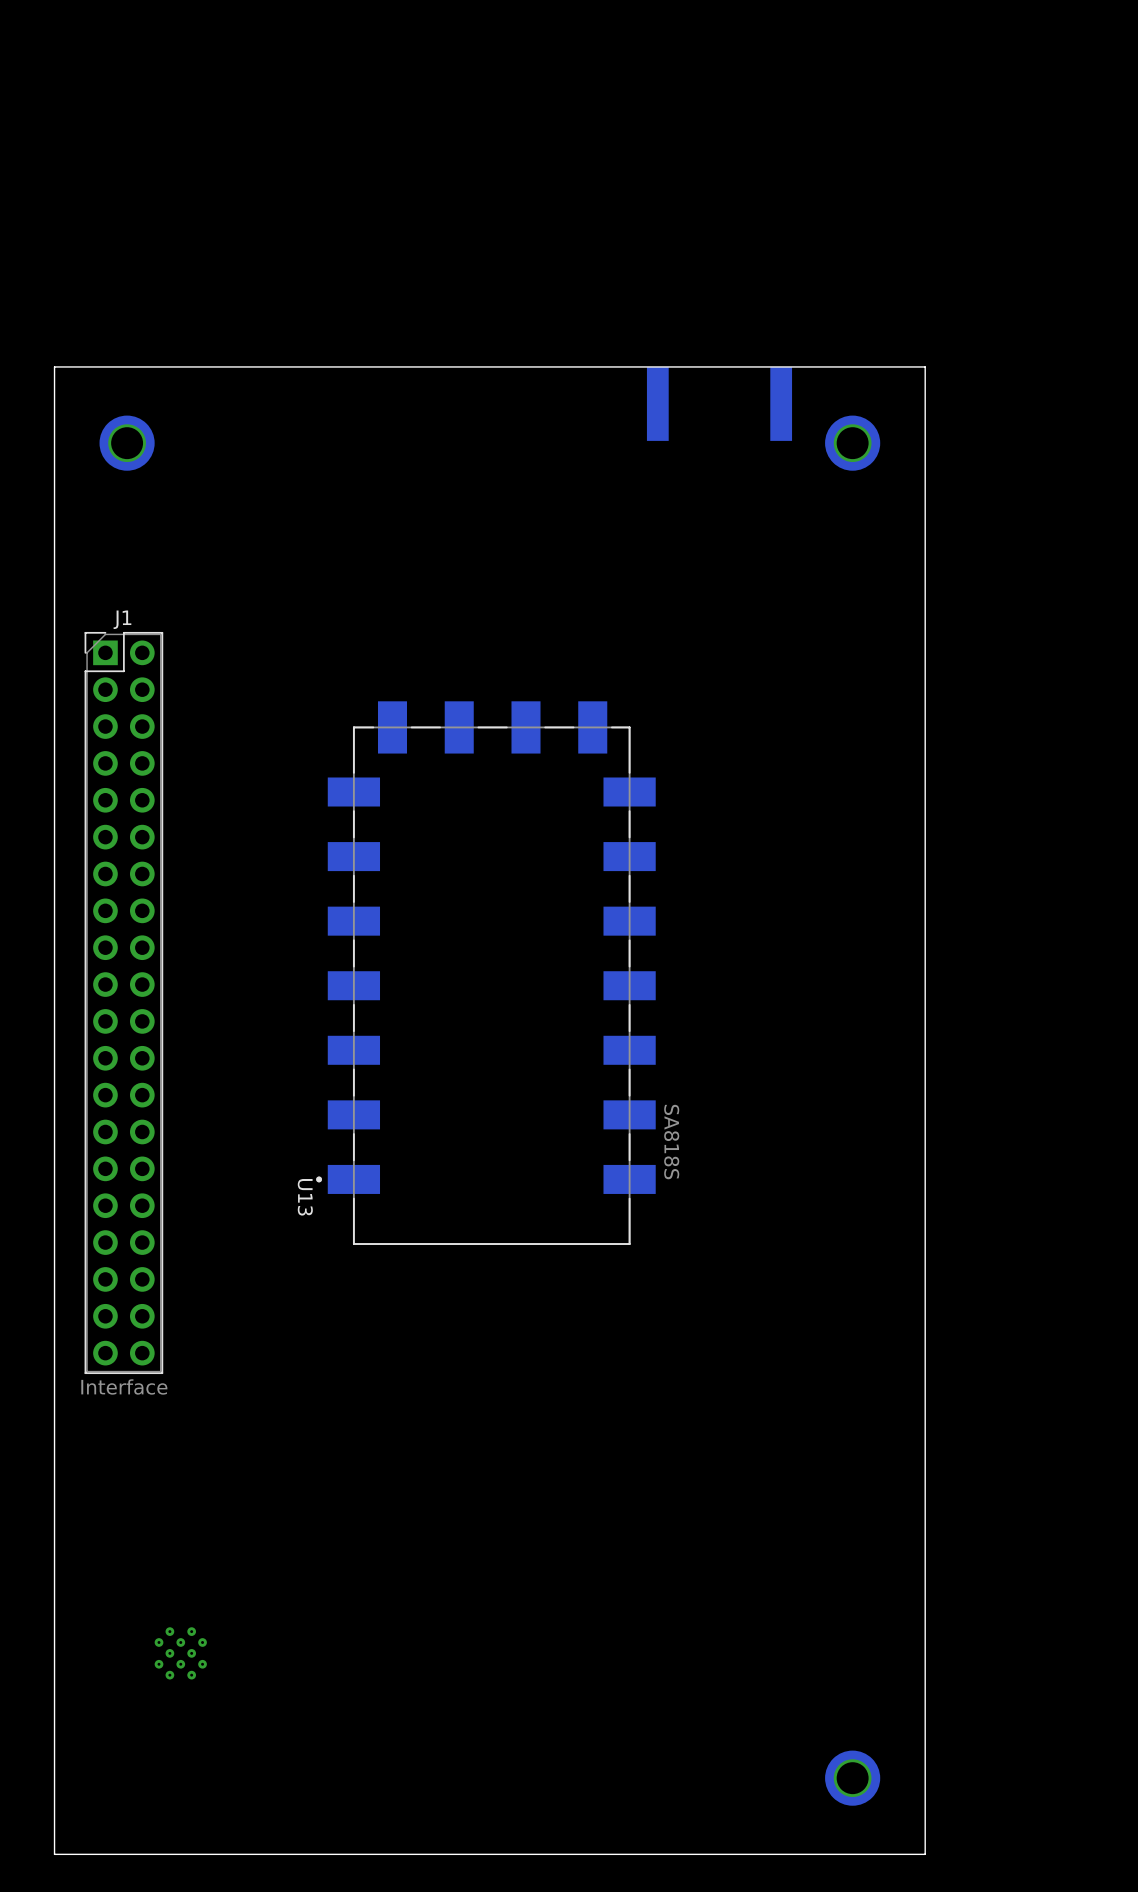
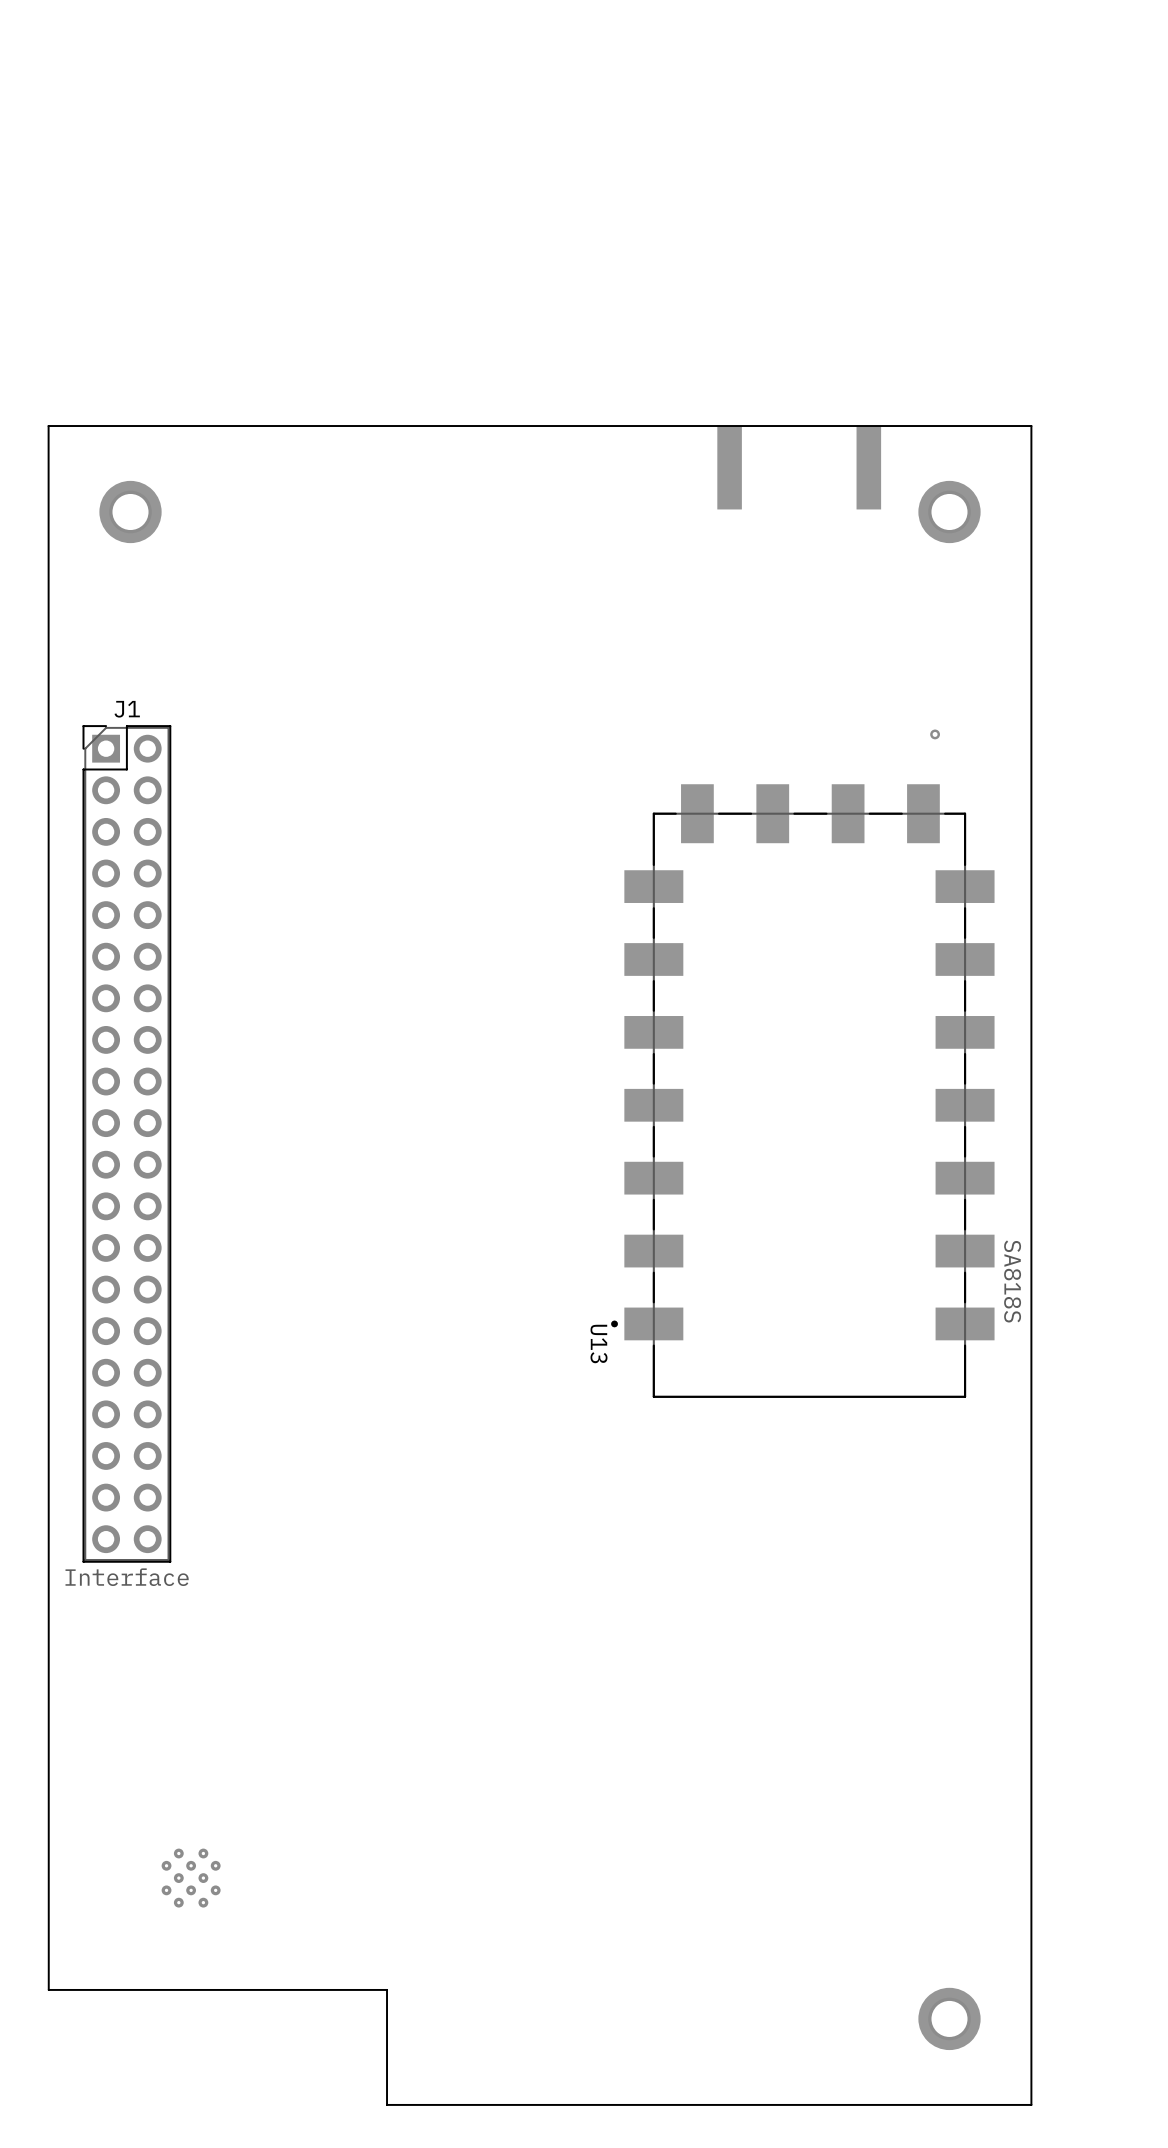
board edge: (54, 366) (54, 1854) (354, 1854) -> (48, 426) (48, 1989) (387, 1989) (387, 2104)
part: none -> (935, 734)
U13 position: (485, 973) -> (802, 1091)

